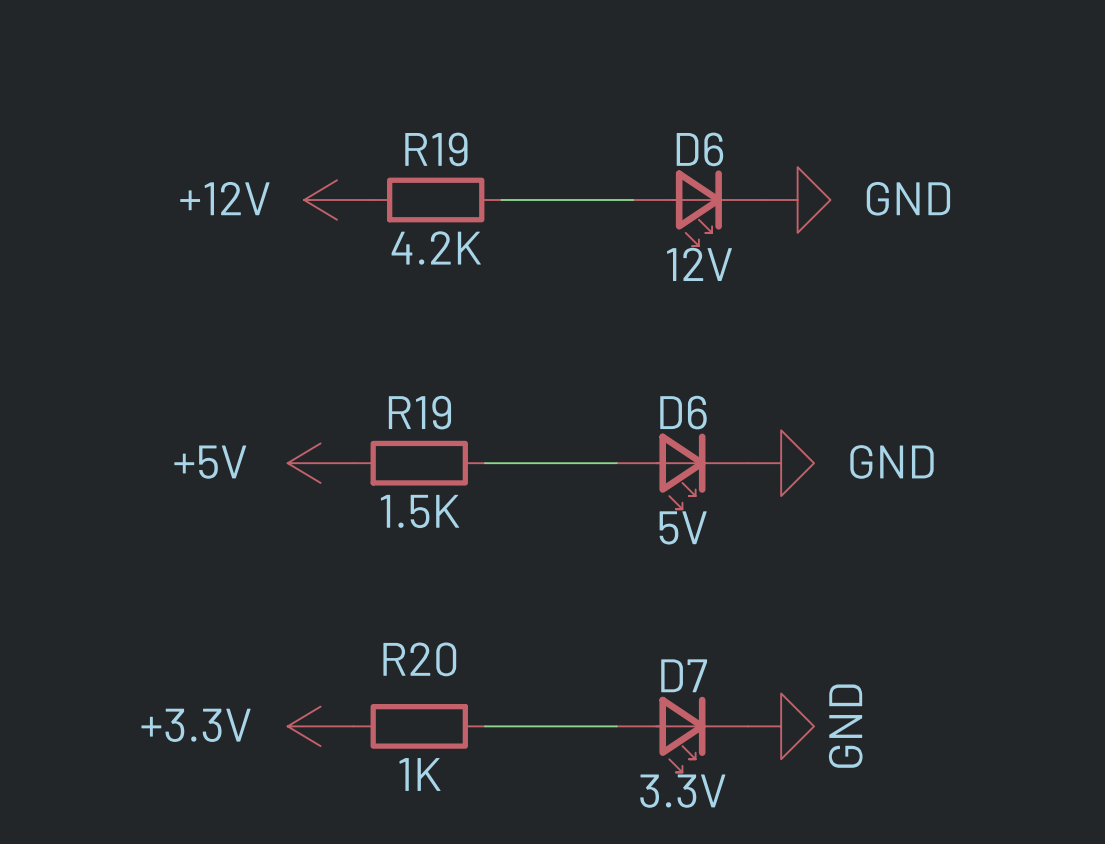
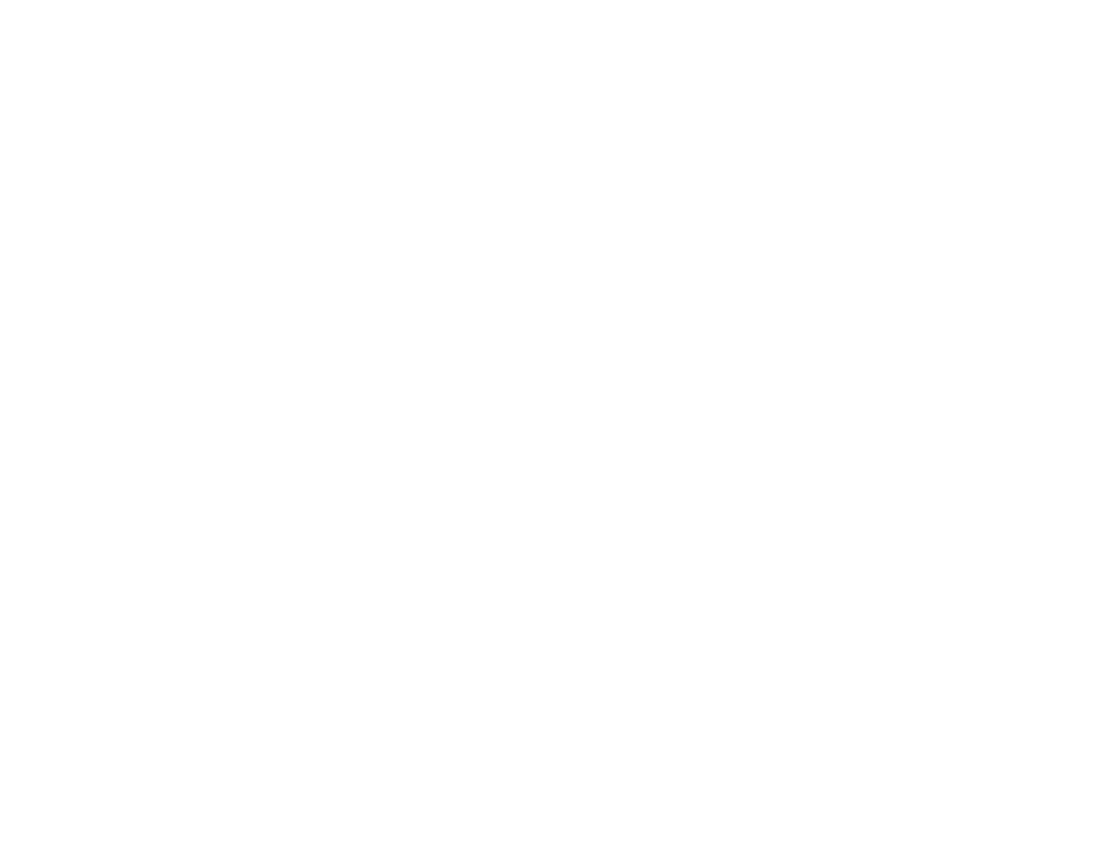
power symbol: +12V (337, 200) -> none
R19: 4.2K (435, 200) -> none
wire: (501, 200) (633, 200) -> none
power symbol: GND (797, 200) -> none
D6: 12V (698, 208) -> none
power symbol: +5V (320, 463) -> none
R19: 1.5K (419, 463) -> none
wire: (485, 463) (616, 463) -> none
power symbol: GND (781, 463) -> none
D6: 5V (682, 471) -> none
power symbol: +3.3V (320, 726) -> none
R20: 1K (419, 726) -> none
wire: (485, 726) (616, 726) -> none
power symbol: GND (781, 726) -> none
D7: 3.3V (682, 734) -> none

